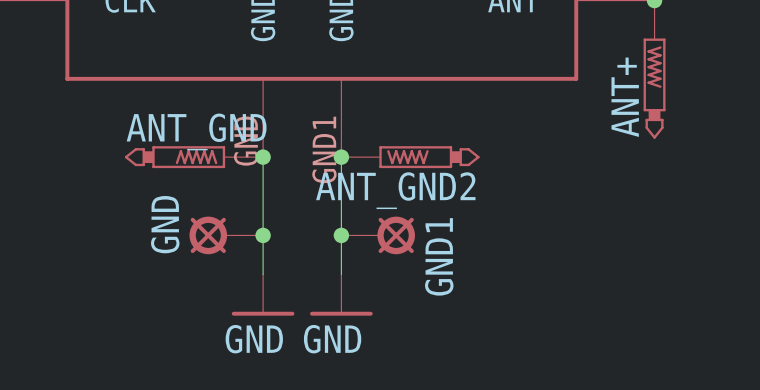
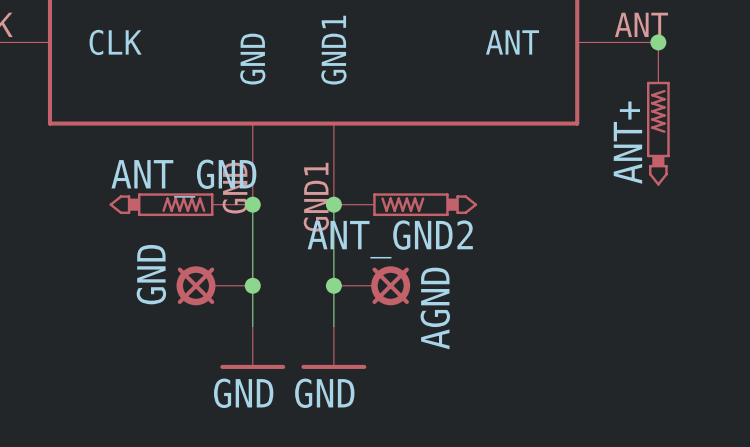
GND1 name: GND1 (439, 256) -> AGND (435, 308)

